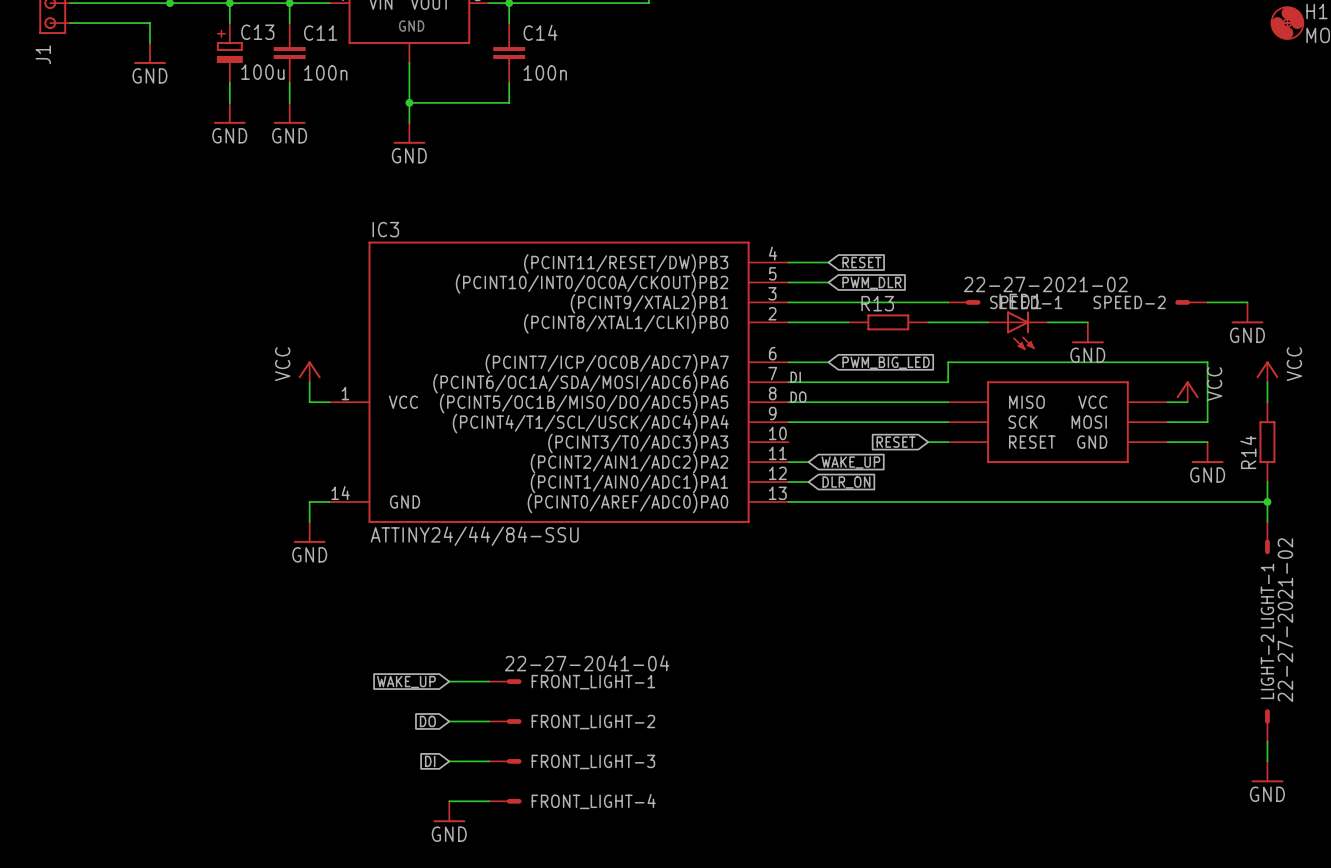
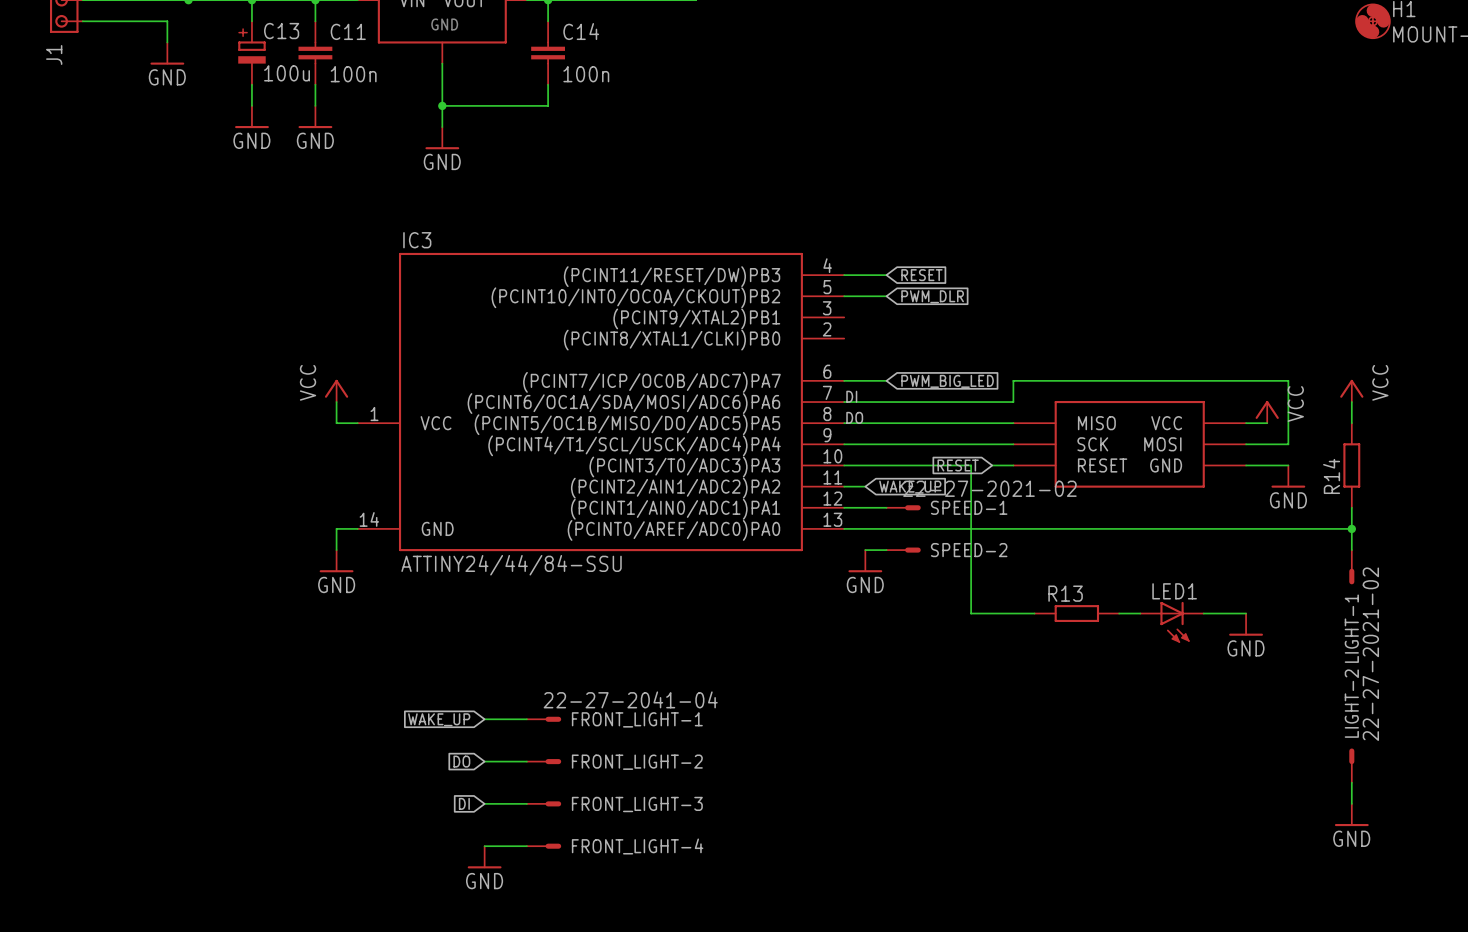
wire: (788, 302) (948, 302) -> none
SPEED-1 position: (964, 302) -> (903, 507)
SPEED-2 rotation: 0° (1182, 302) -> 180° (912, 550)
SPEED-2 position: (1191, 302) -> (903, 550)
wire: (1207, 302) (1247, 302) -> none
power symbol: GND (1247, 312) -> none
wire: (788, 322) (848, 322) -> none
R13 position: (888, 322) -> (1076, 613)
wire: (928, 322) (988, 322) -> none
wire: (1047, 322) (1087, 322) -> none
LED1 position: (1018, 330) -> (1172, 622)
power symbol: GND (1087, 332) -> none
wire: none -> (844, 465) (971, 465) (971, 613) (1034, 613)
wire: none -> (865, 507) (886, 507)
global label: DLR_ON (846, 482) -> none
wire: none -> (865, 550) (886, 550)
power symbol: none -> GND (865, 561)
wire: none -> (1119, 613) (1140, 613)
wire: none -> (1203, 613) (1246, 613)
power symbol: none -> GND (1246, 624)

